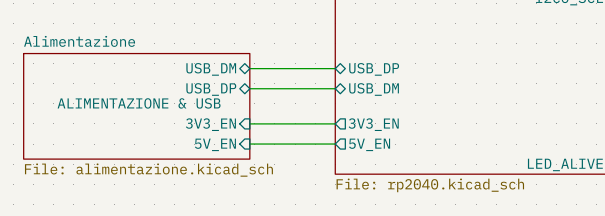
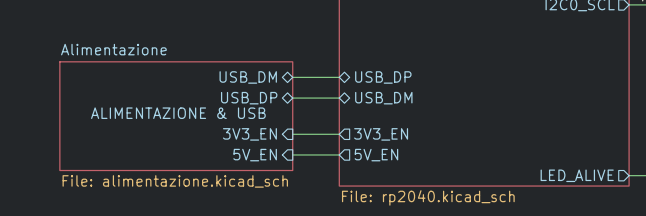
wire: (249, 68) (290, 68) -> none
sheet pin position: USB_DM (211, 69) -> USB_DM (248, 77)
wire: (249, 88) (290, 88) -> none
sheet pin position: USB_DP (211, 89) -> USB_DP (249, 98)
sheet Alimentazione position: (136, 106) -> (176, 116)
wire: (249, 123) (290, 123) -> none
sheet pin position: 3V3_EN (210, 124) -> 3V3_EN (249, 134)
sheet pin position: 5V_EN (215, 144) -> 5V_EN (255, 155)
wire: (249, 144) (290, 144) -> none

